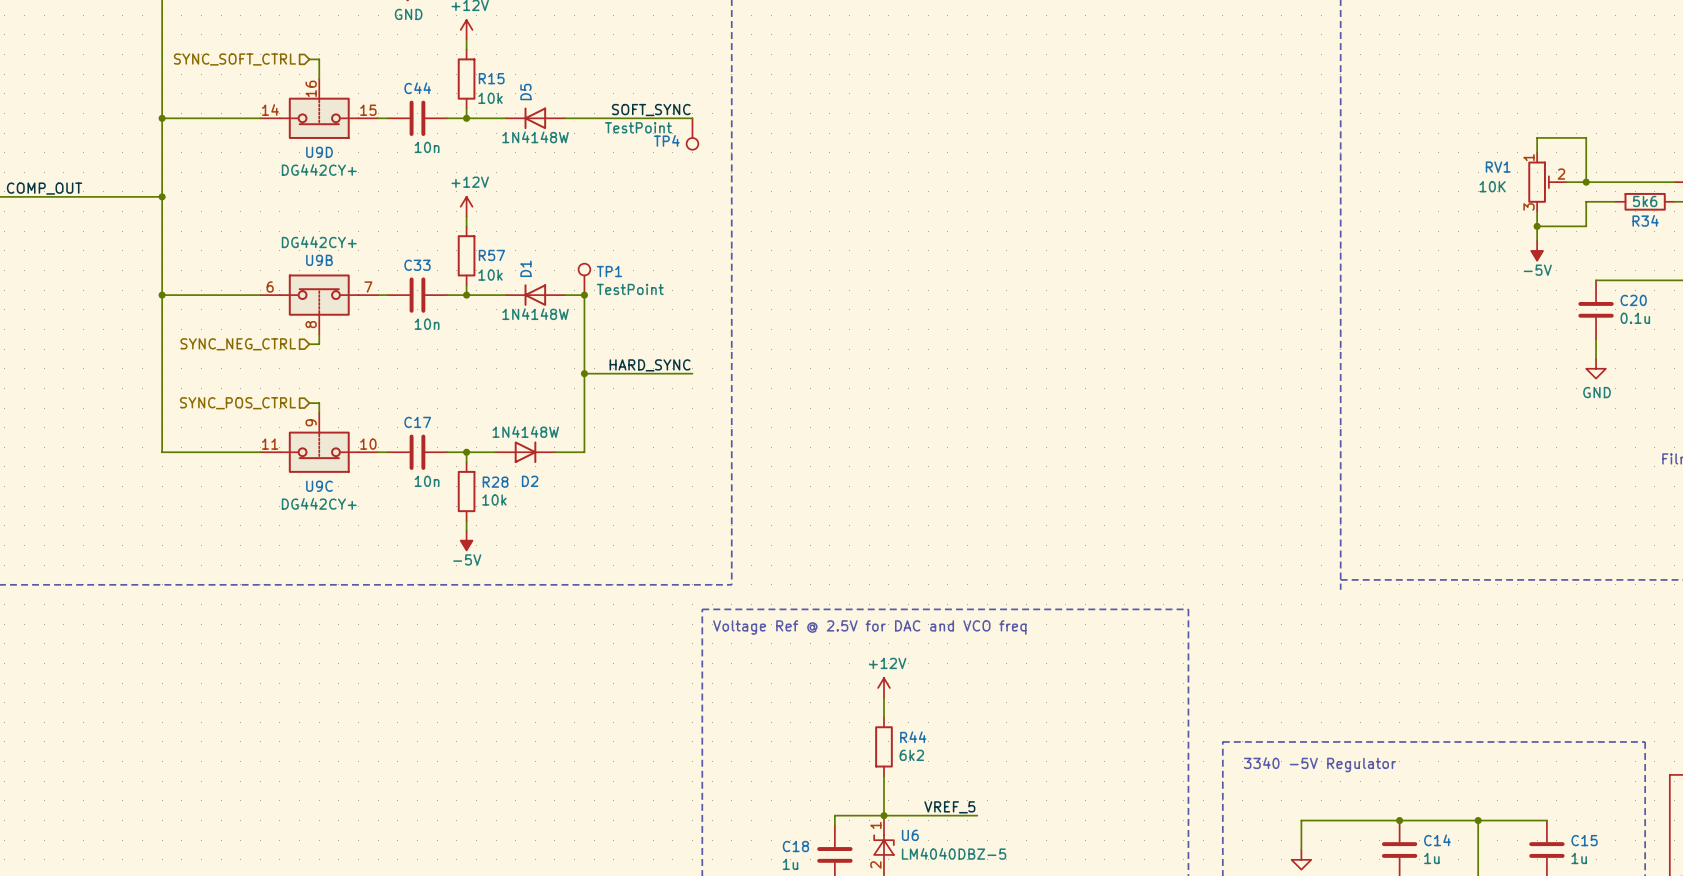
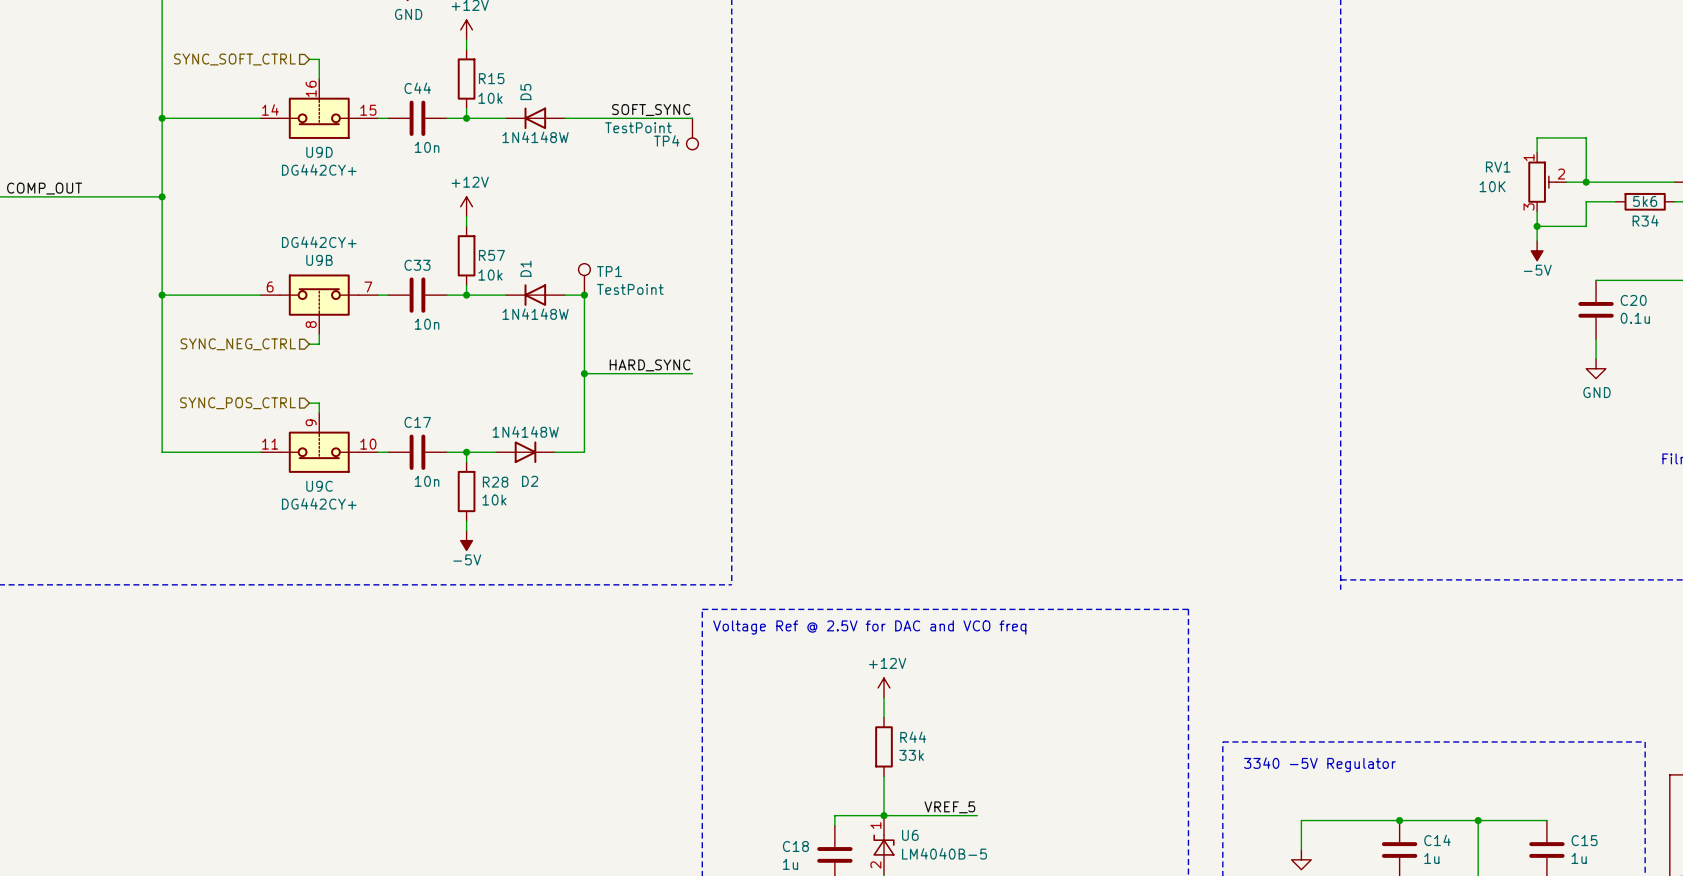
R44 value: 6k2 (911, 755) -> 33k (911, 755)
U6 value: LM4040DBZ-5 (954, 853) -> LM4040B-5 (944, 853)

